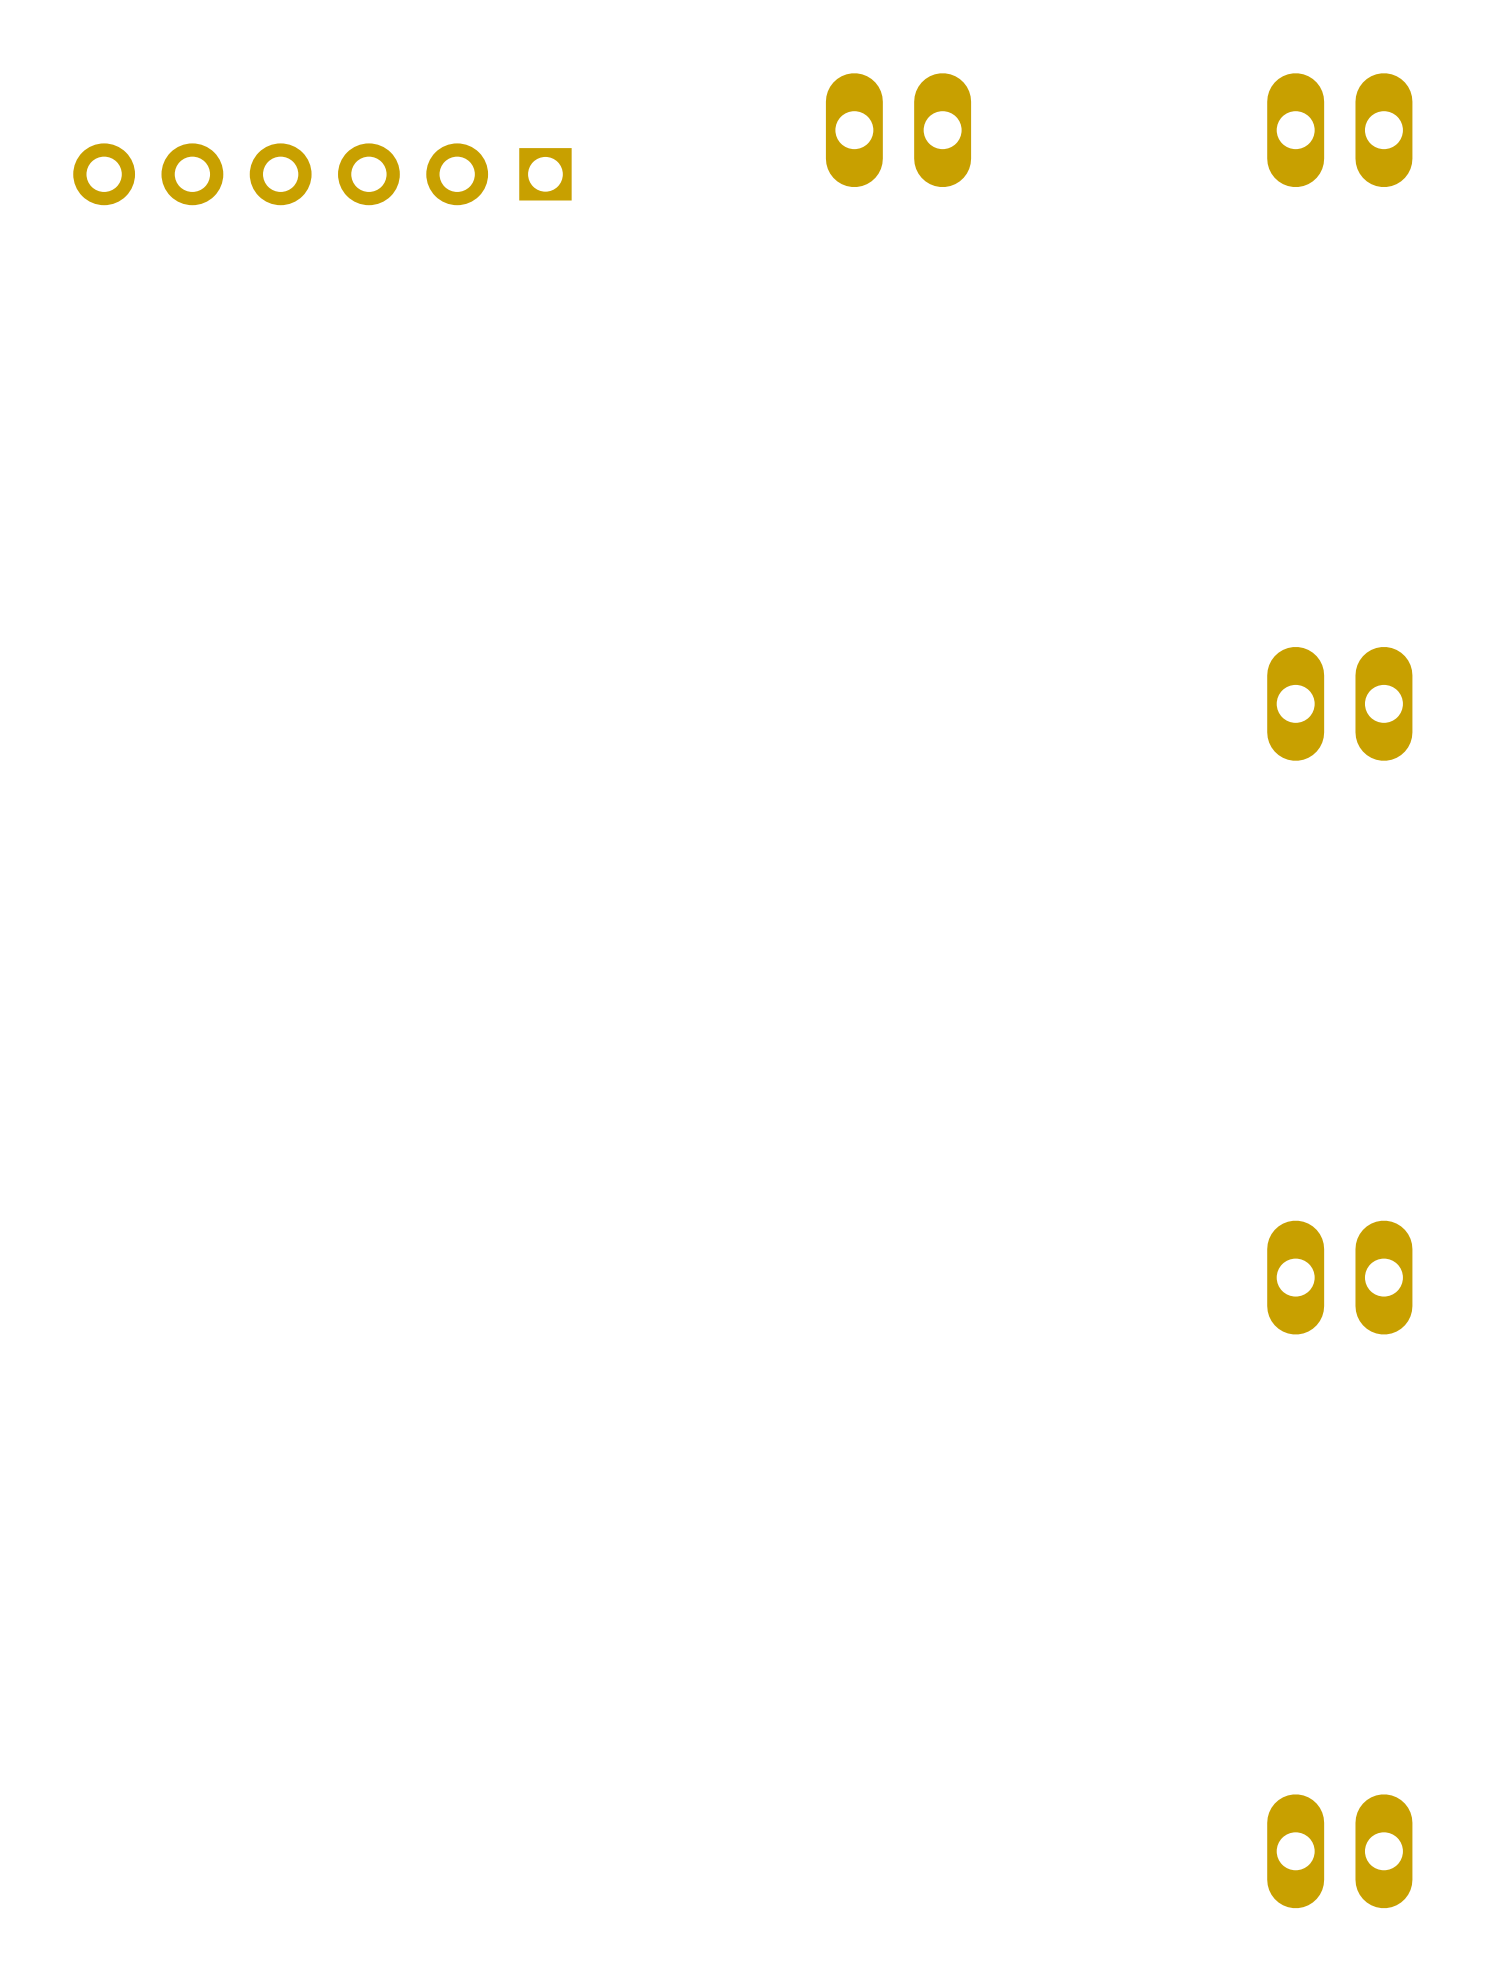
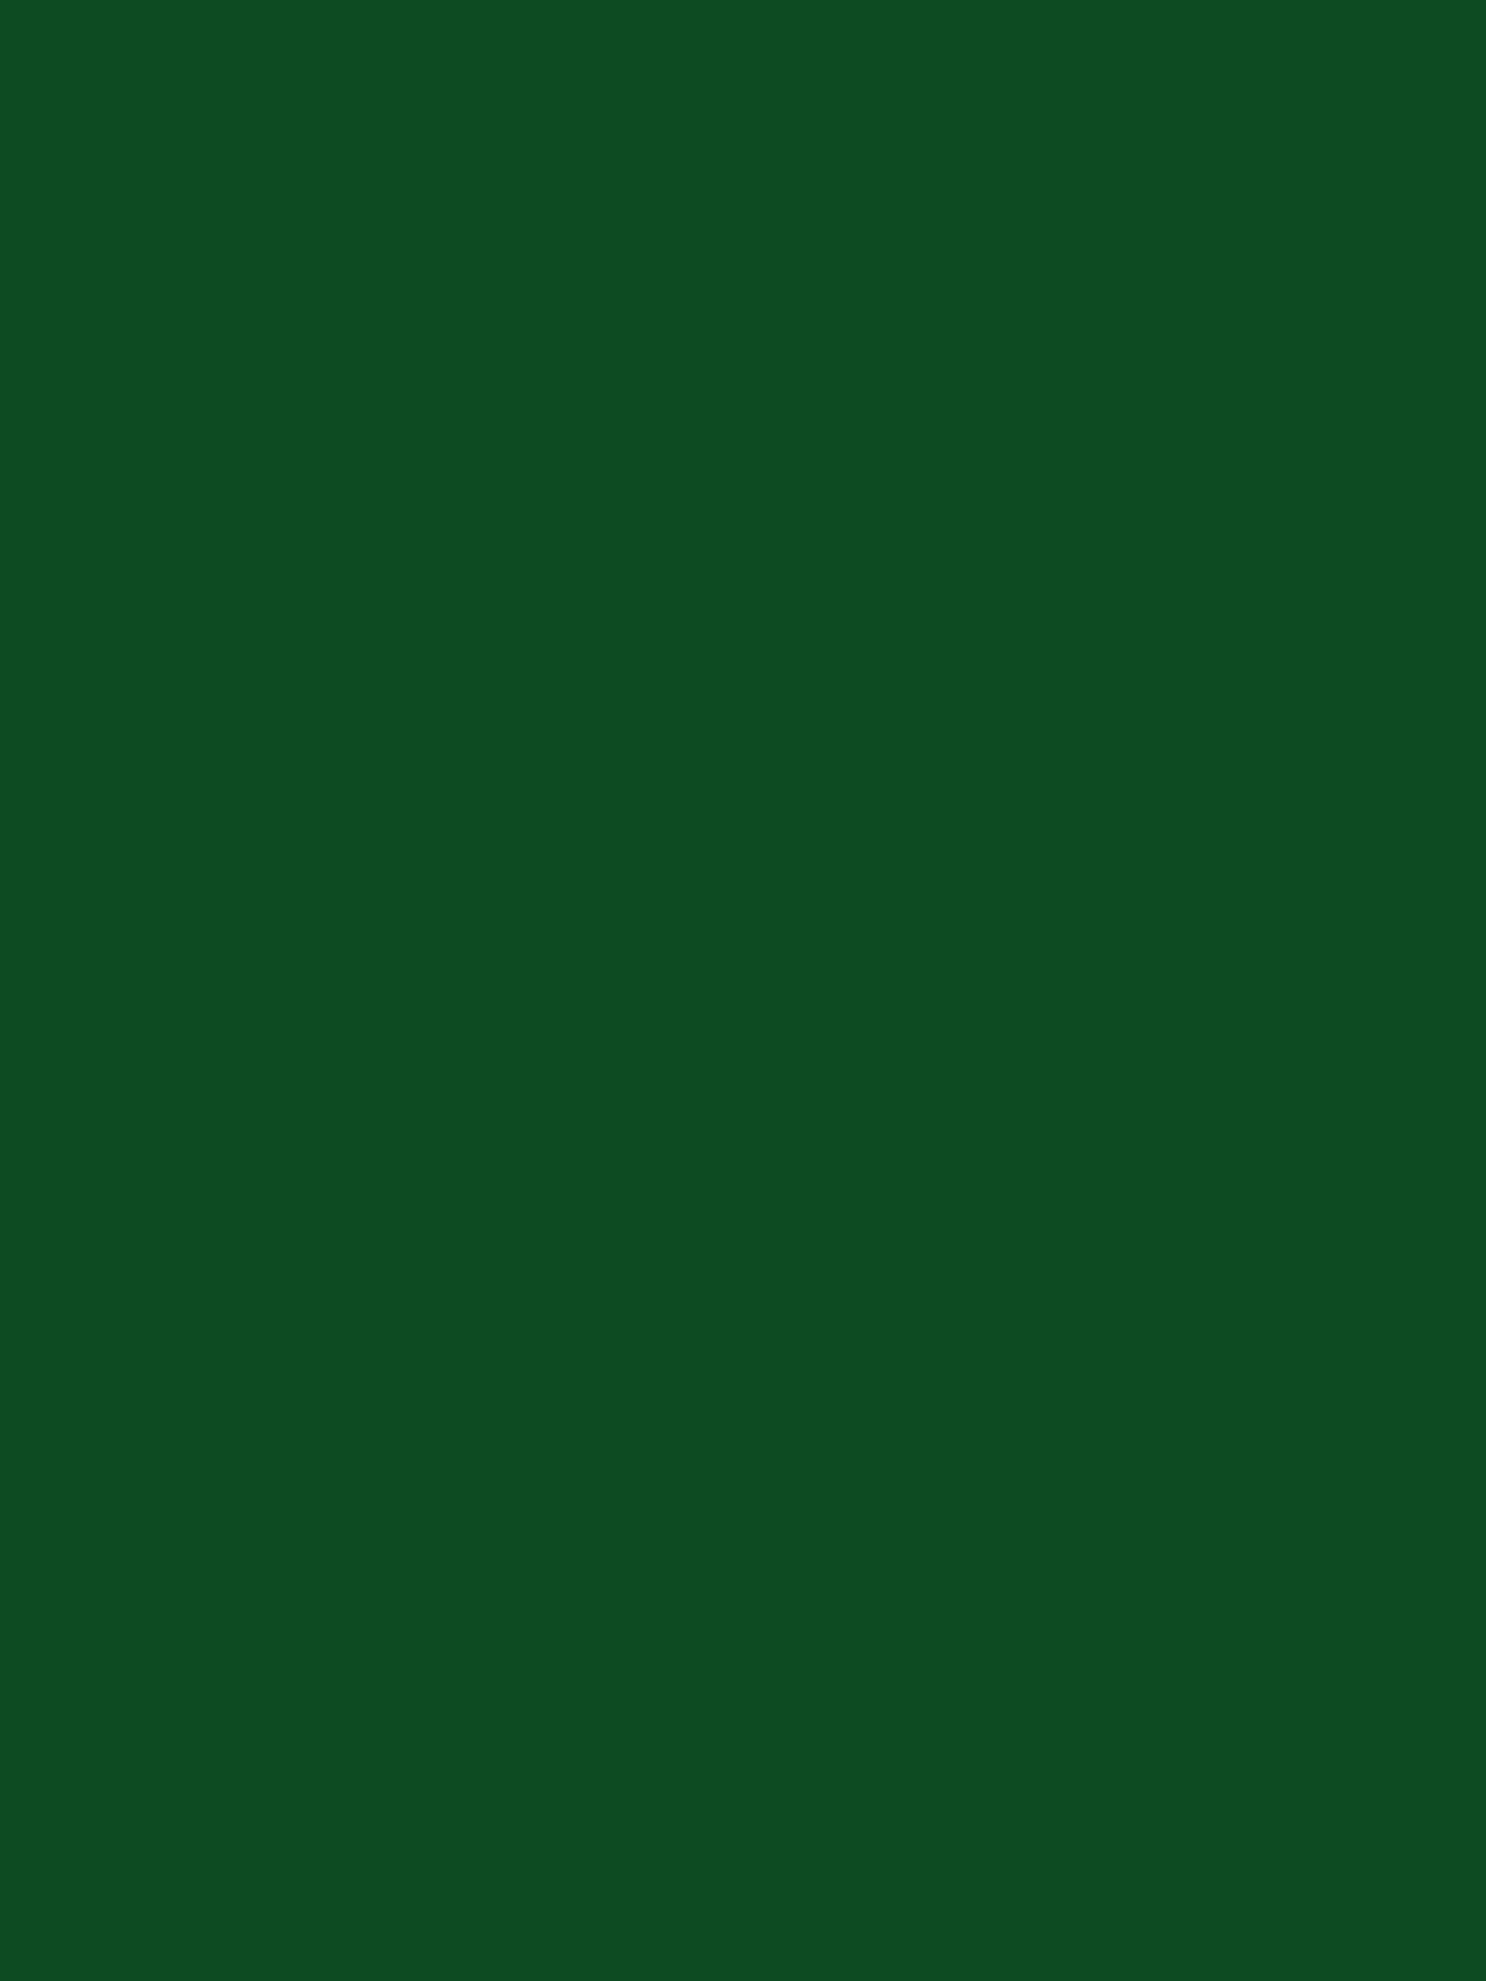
part: (898, 130) -> none
part: (1339, 130) -> none
part: (322, 174) -> none
part: (1339, 703) -> none
part: (1339, 1277) -> none
part: (1339, 1851) -> none

